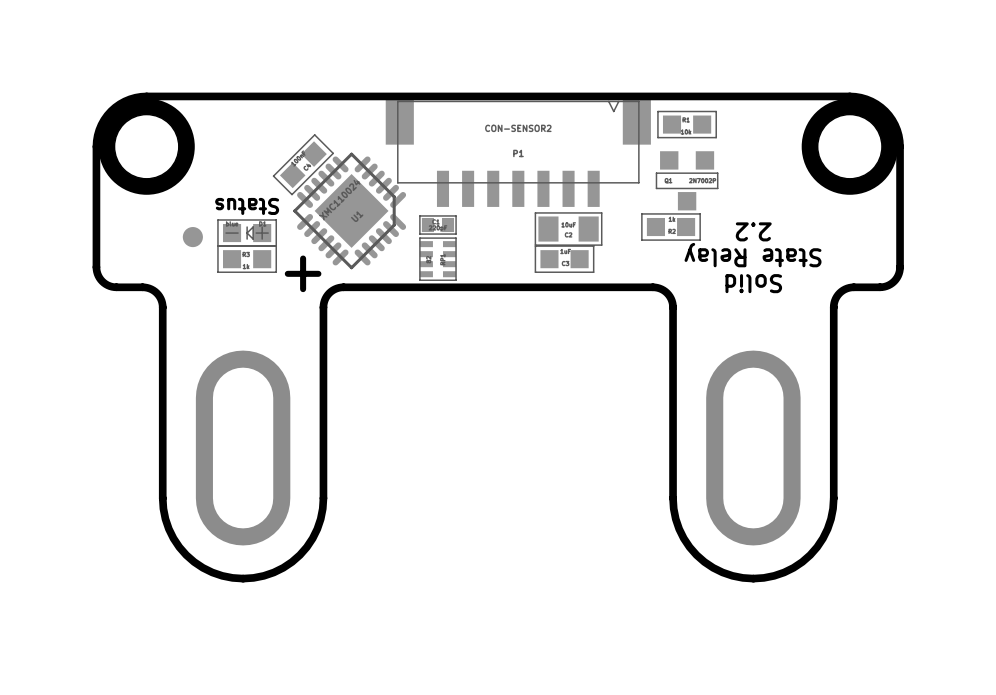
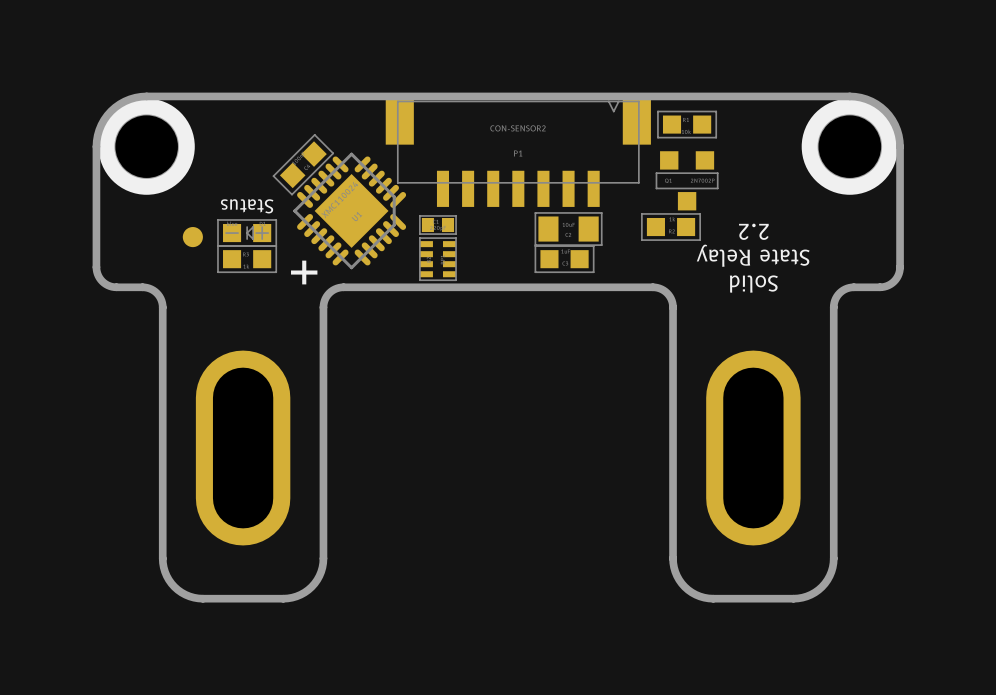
board edge: (162, 498) (168, 528) (186, 555) (212, 572) (243, 578) (273, 572) (299, 555) (317, 528) (323, 498) -> (162, 498) (162, 558) (164, 571) (171, 583) (181, 592) (189, 596) (202, 598) (287, 598) (296, 596) (308, 589) (319, 575) (323, 563) (323, 498)
board edge: (673, 498) (679, 528) (696, 555) (722, 572) (753, 578) (784, 572) (810, 555) (827, 528) (833, 498) -> (673, 498) (673, 558) (675, 571) (679, 579) (688, 589) (699, 596) (713, 598) (798, 598) (806, 596) (818, 589) (829, 575) (833, 563) (833, 498)

